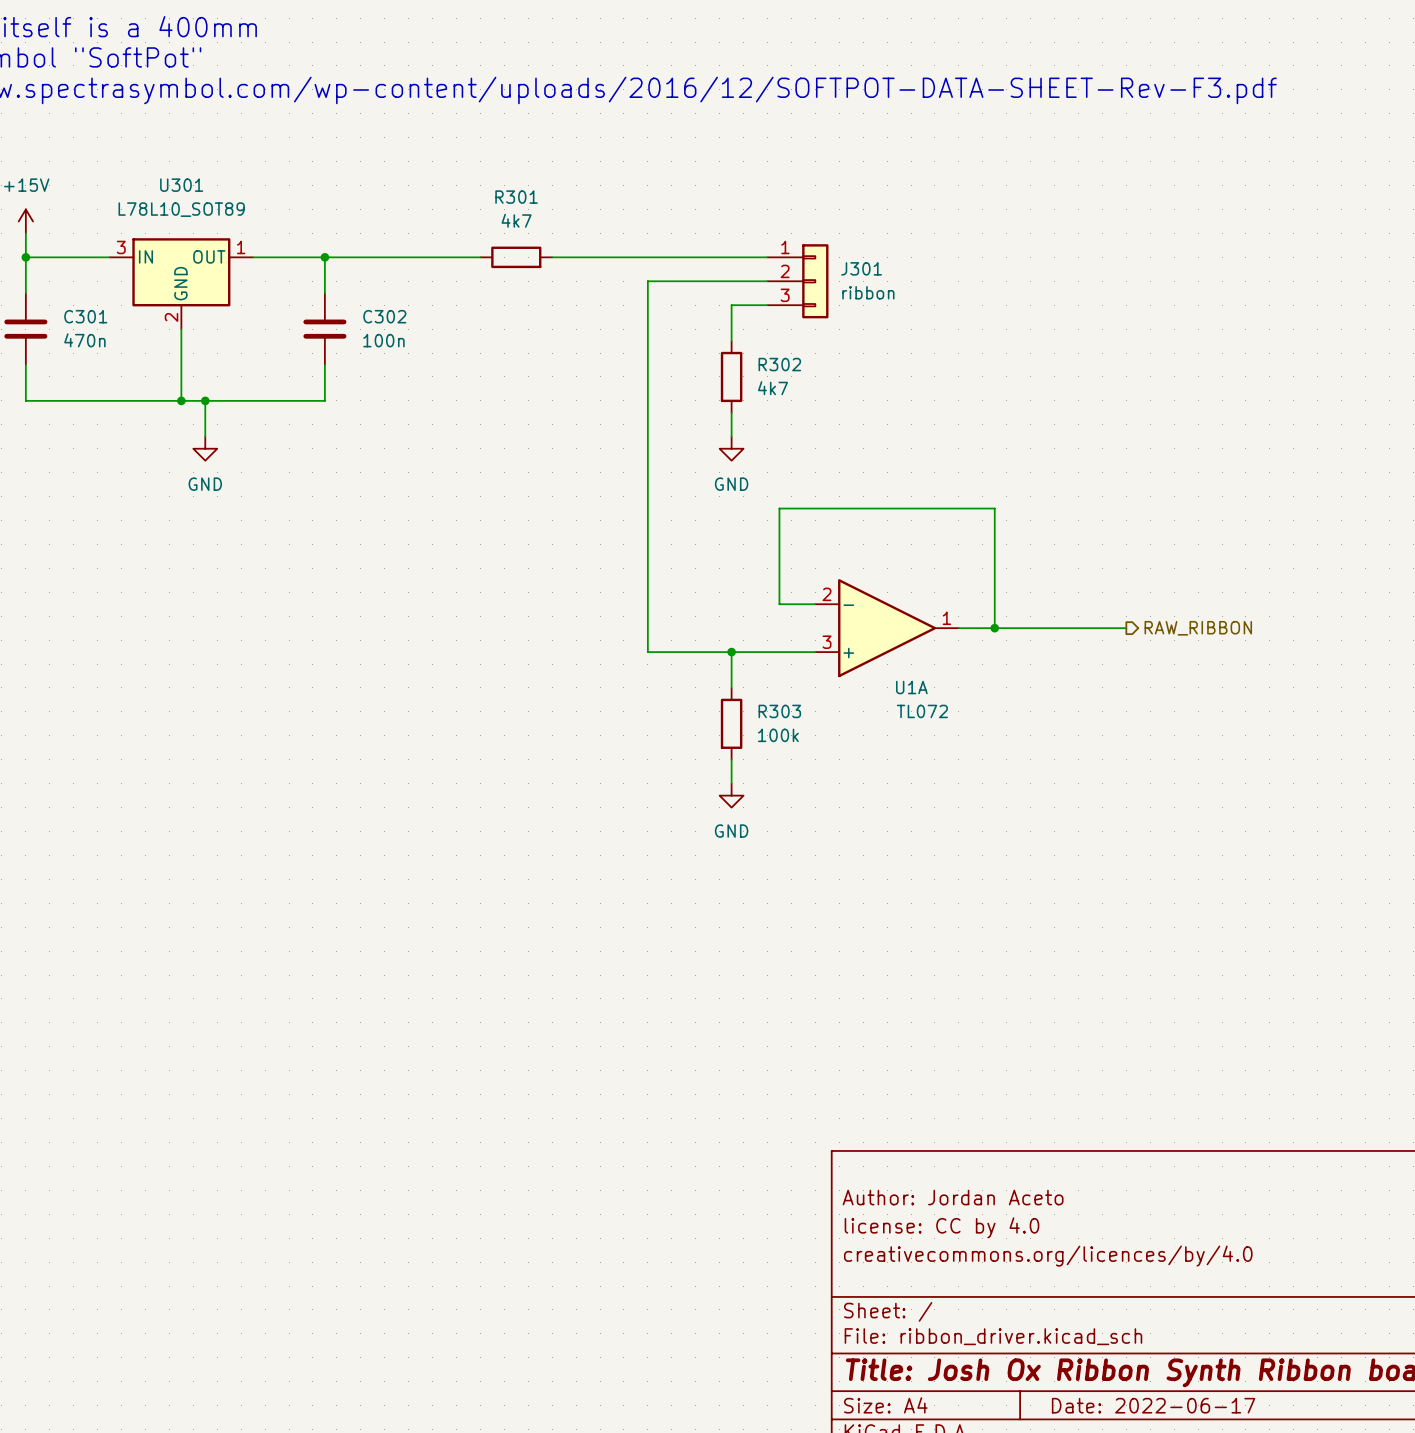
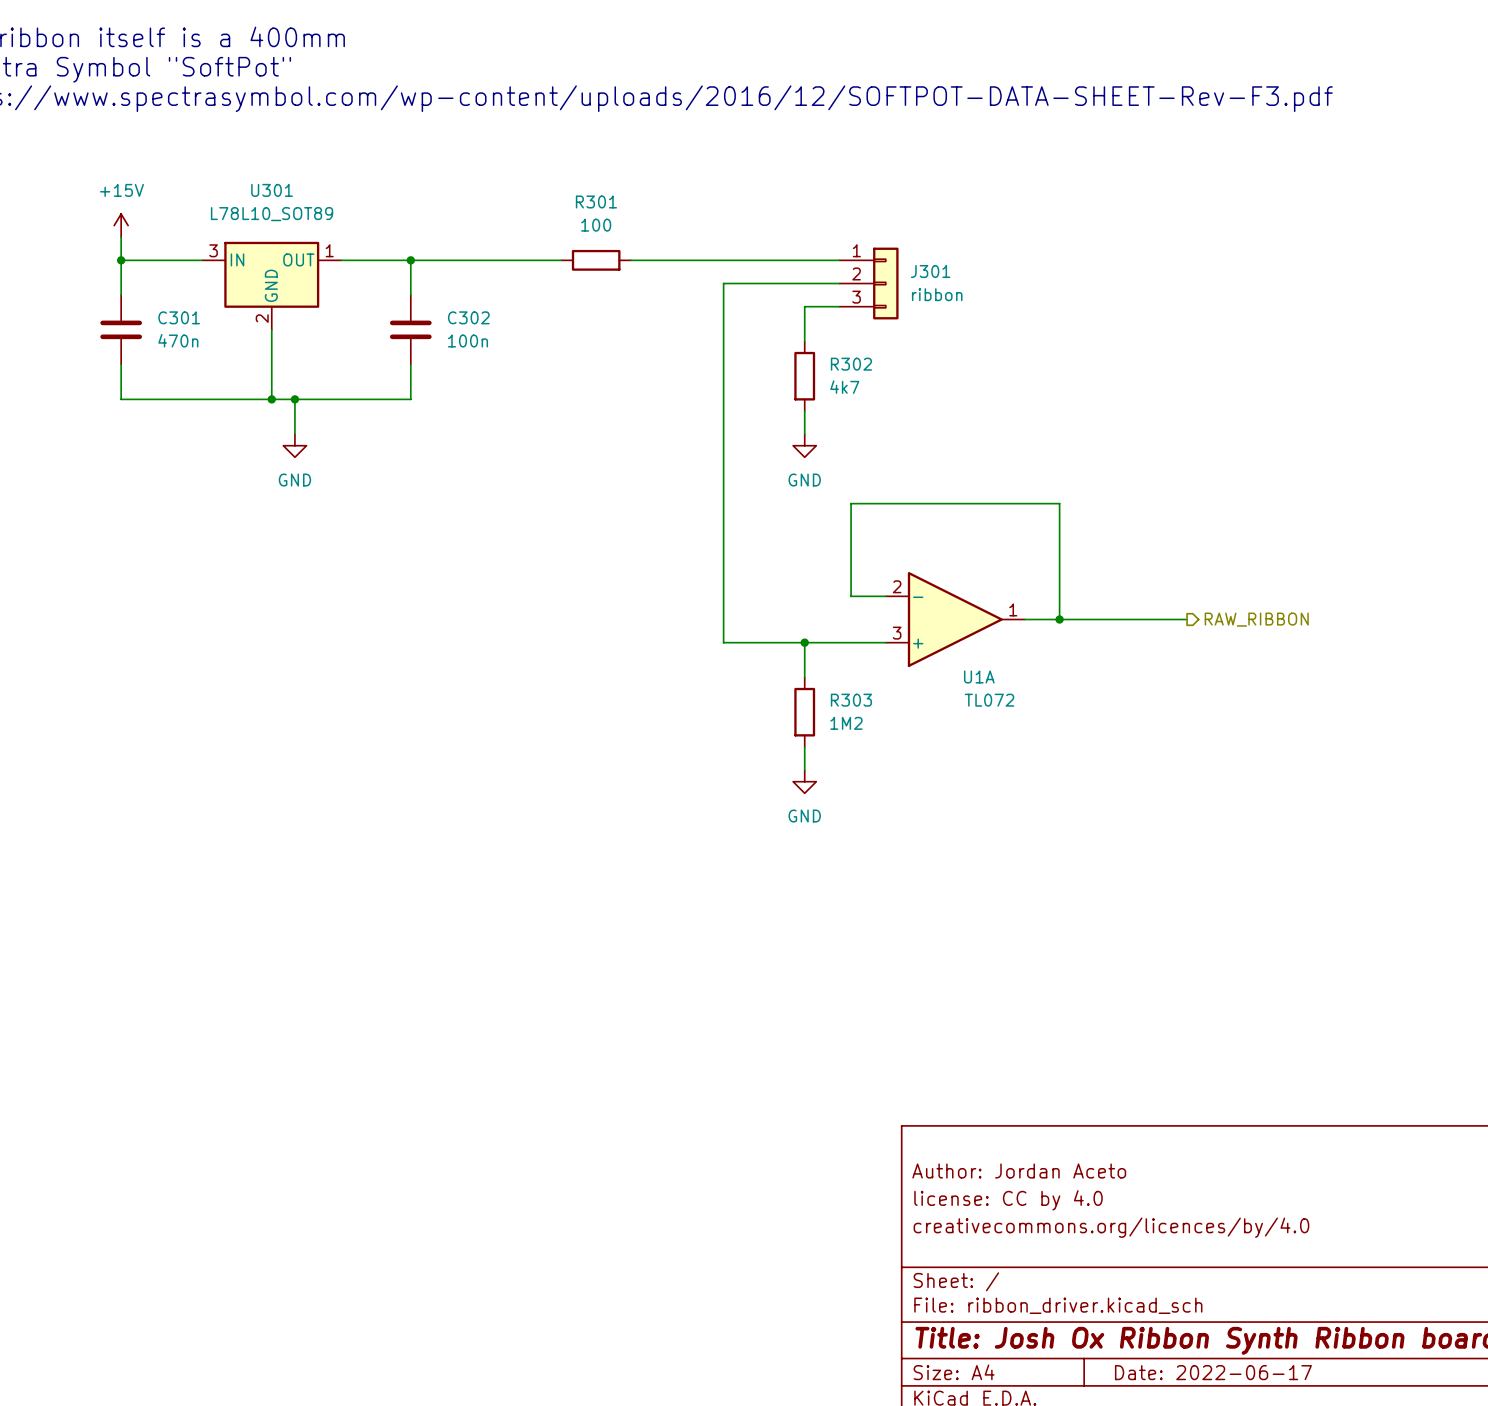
R301 value: 4k7 (516, 220) -> 100 (596, 225)
R303 value: 100k (778, 735) -> 1M2 (846, 723)

